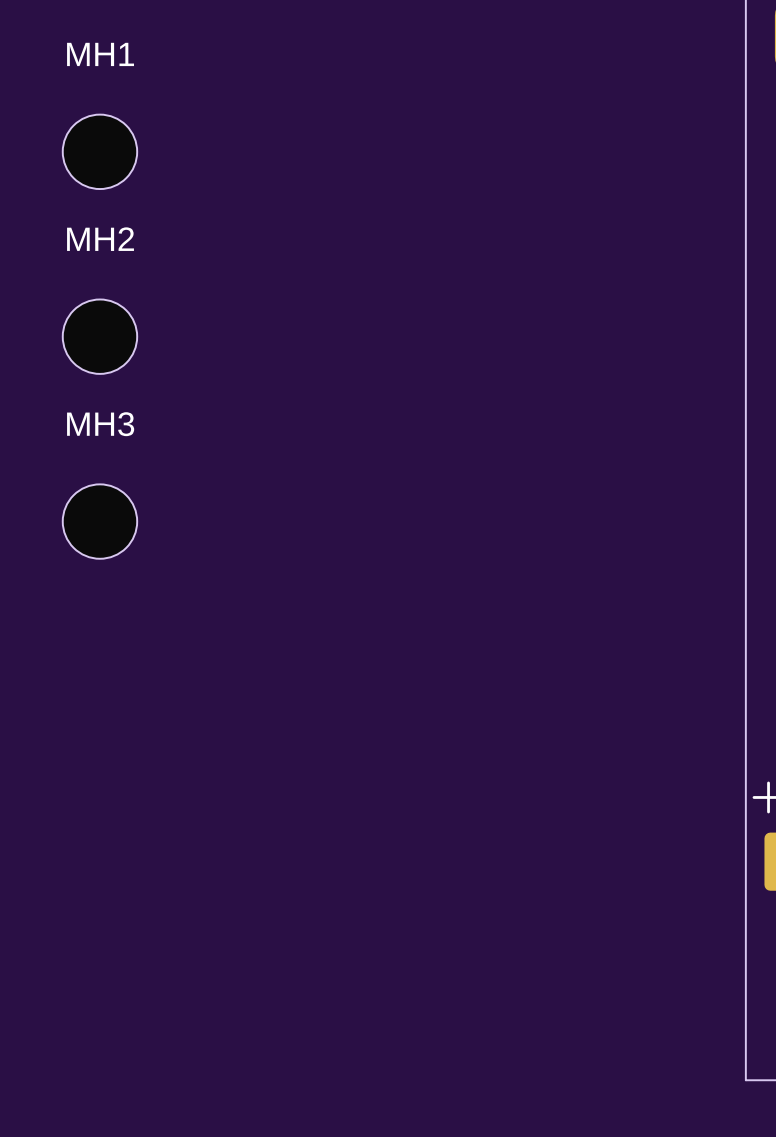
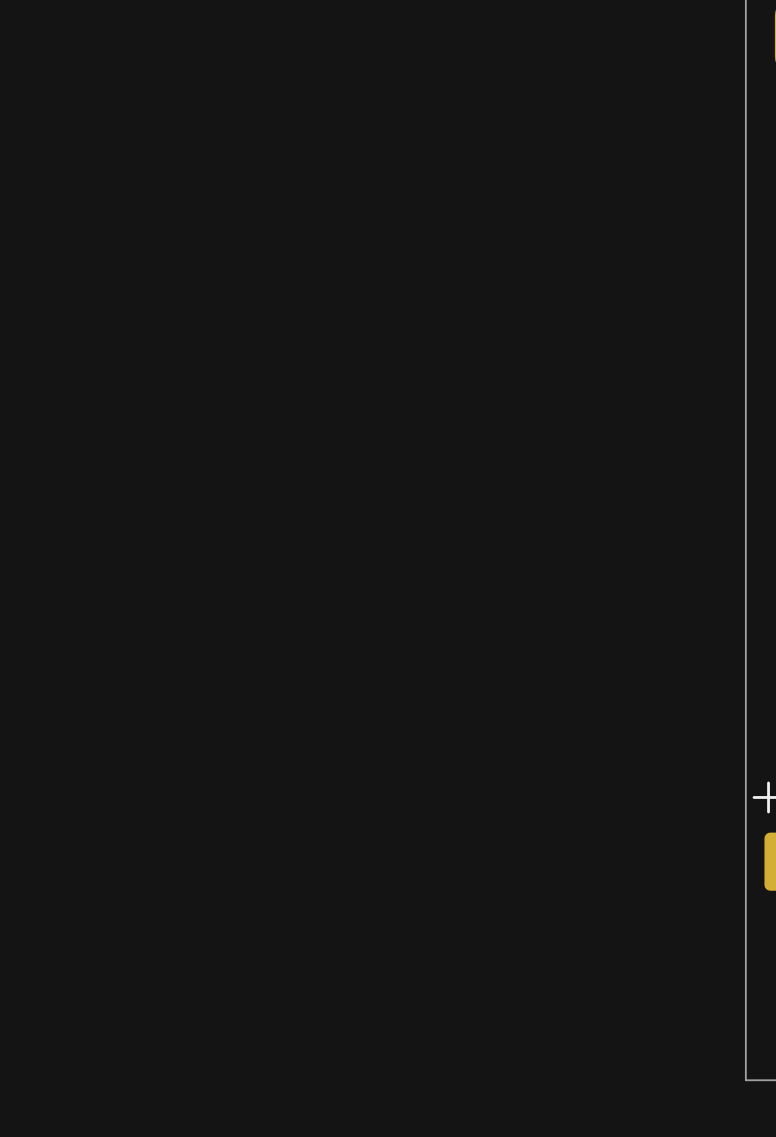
MH1: (99, 151) -> none
MH2: (99, 336) -> none
MH3: (99, 521) -> none

